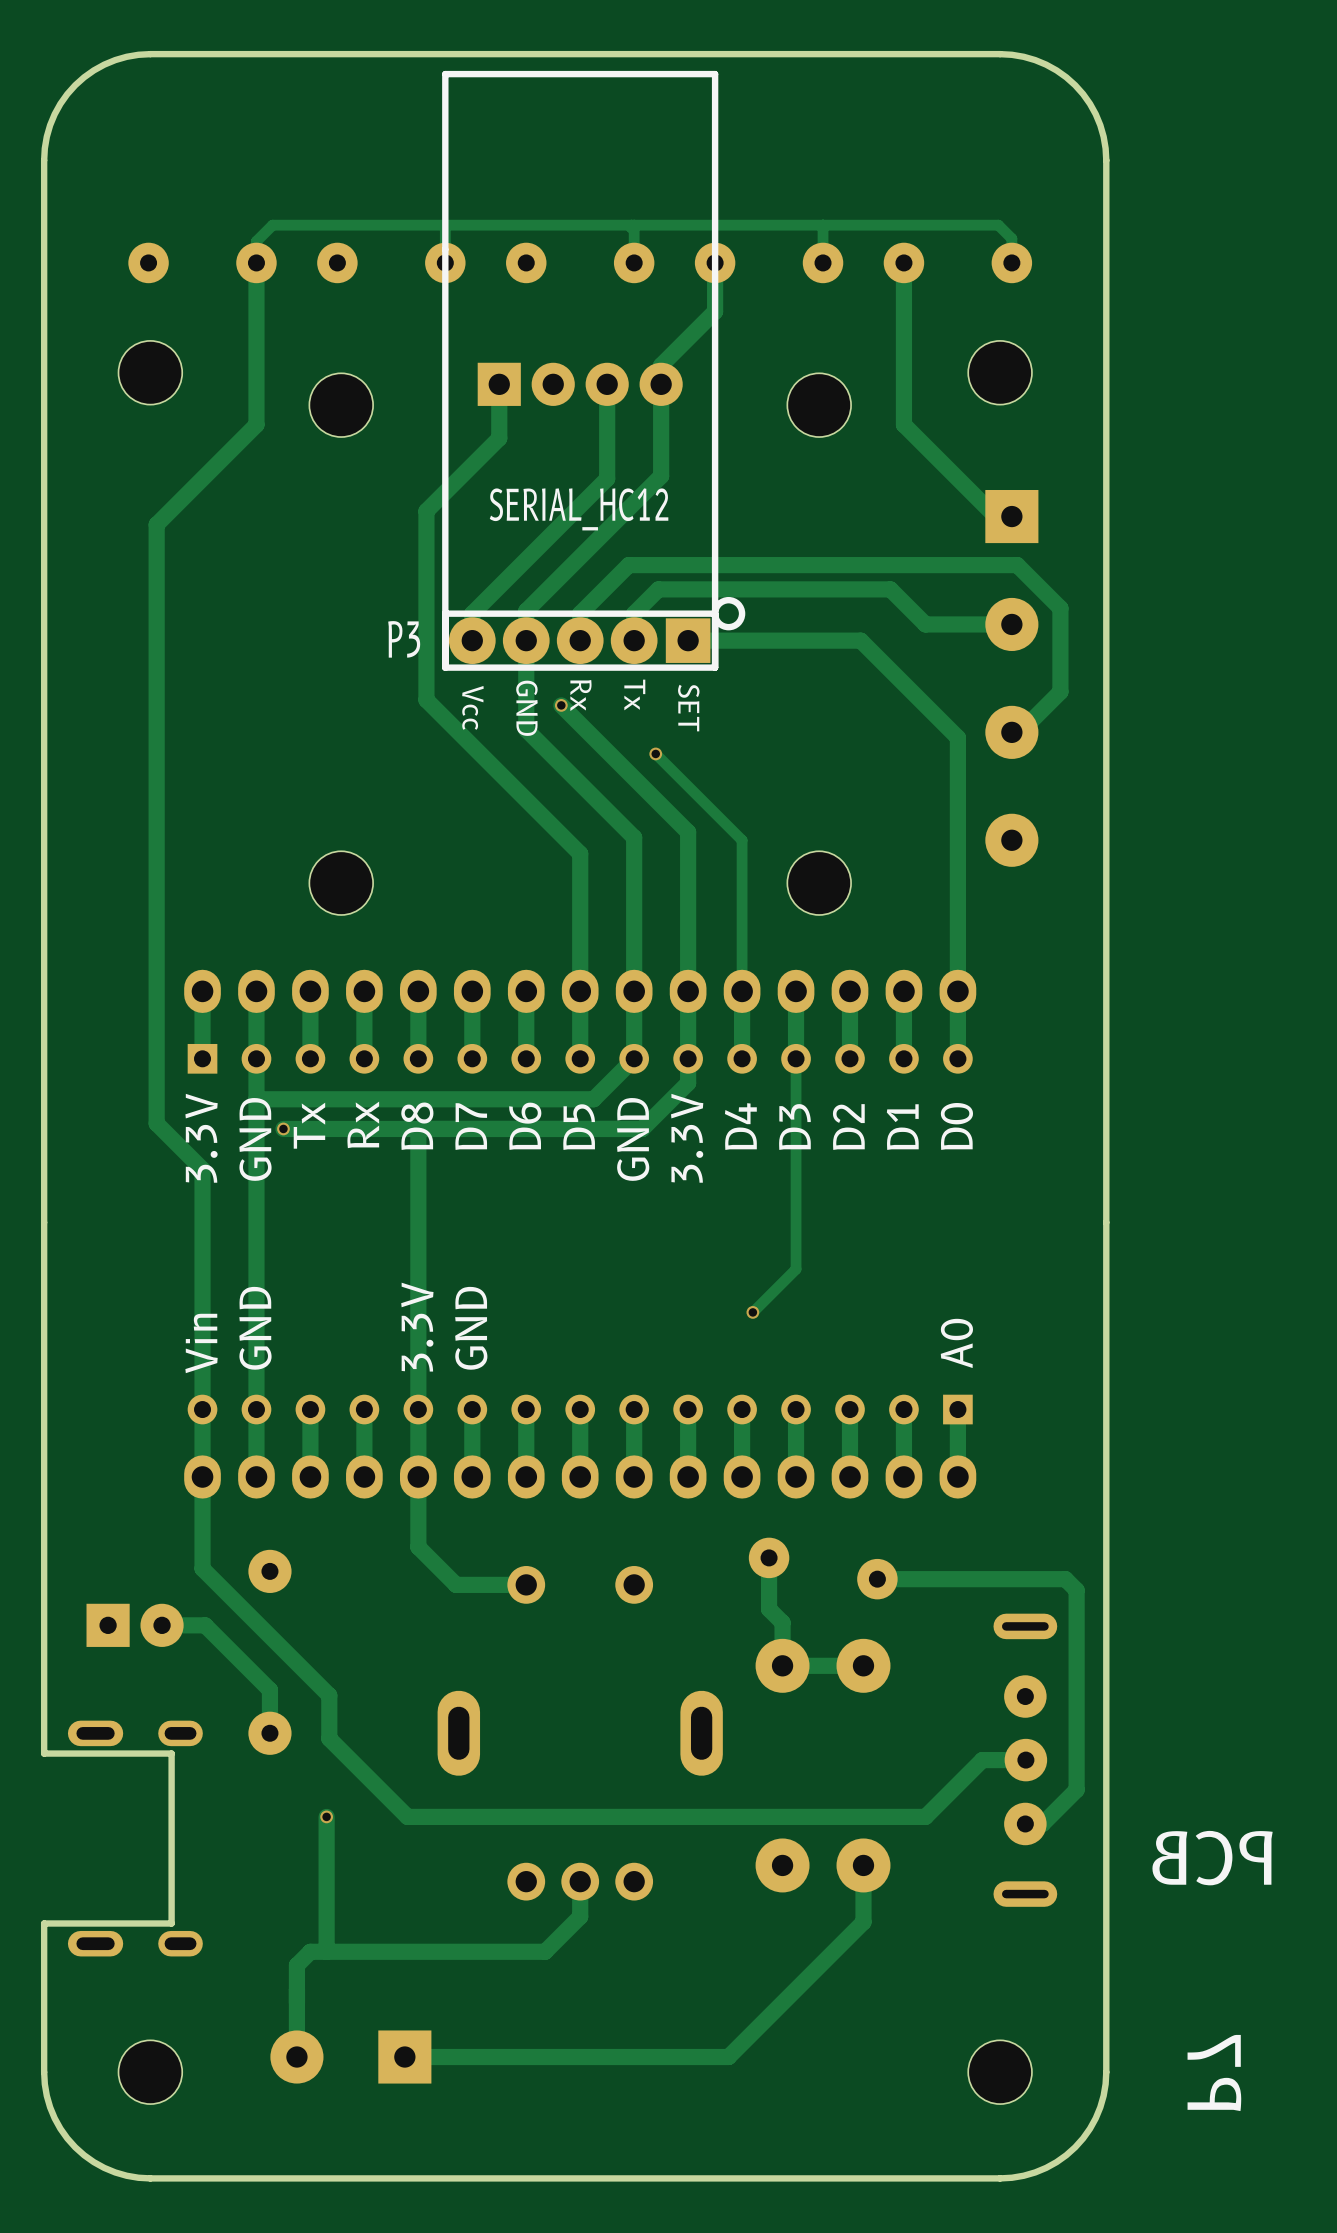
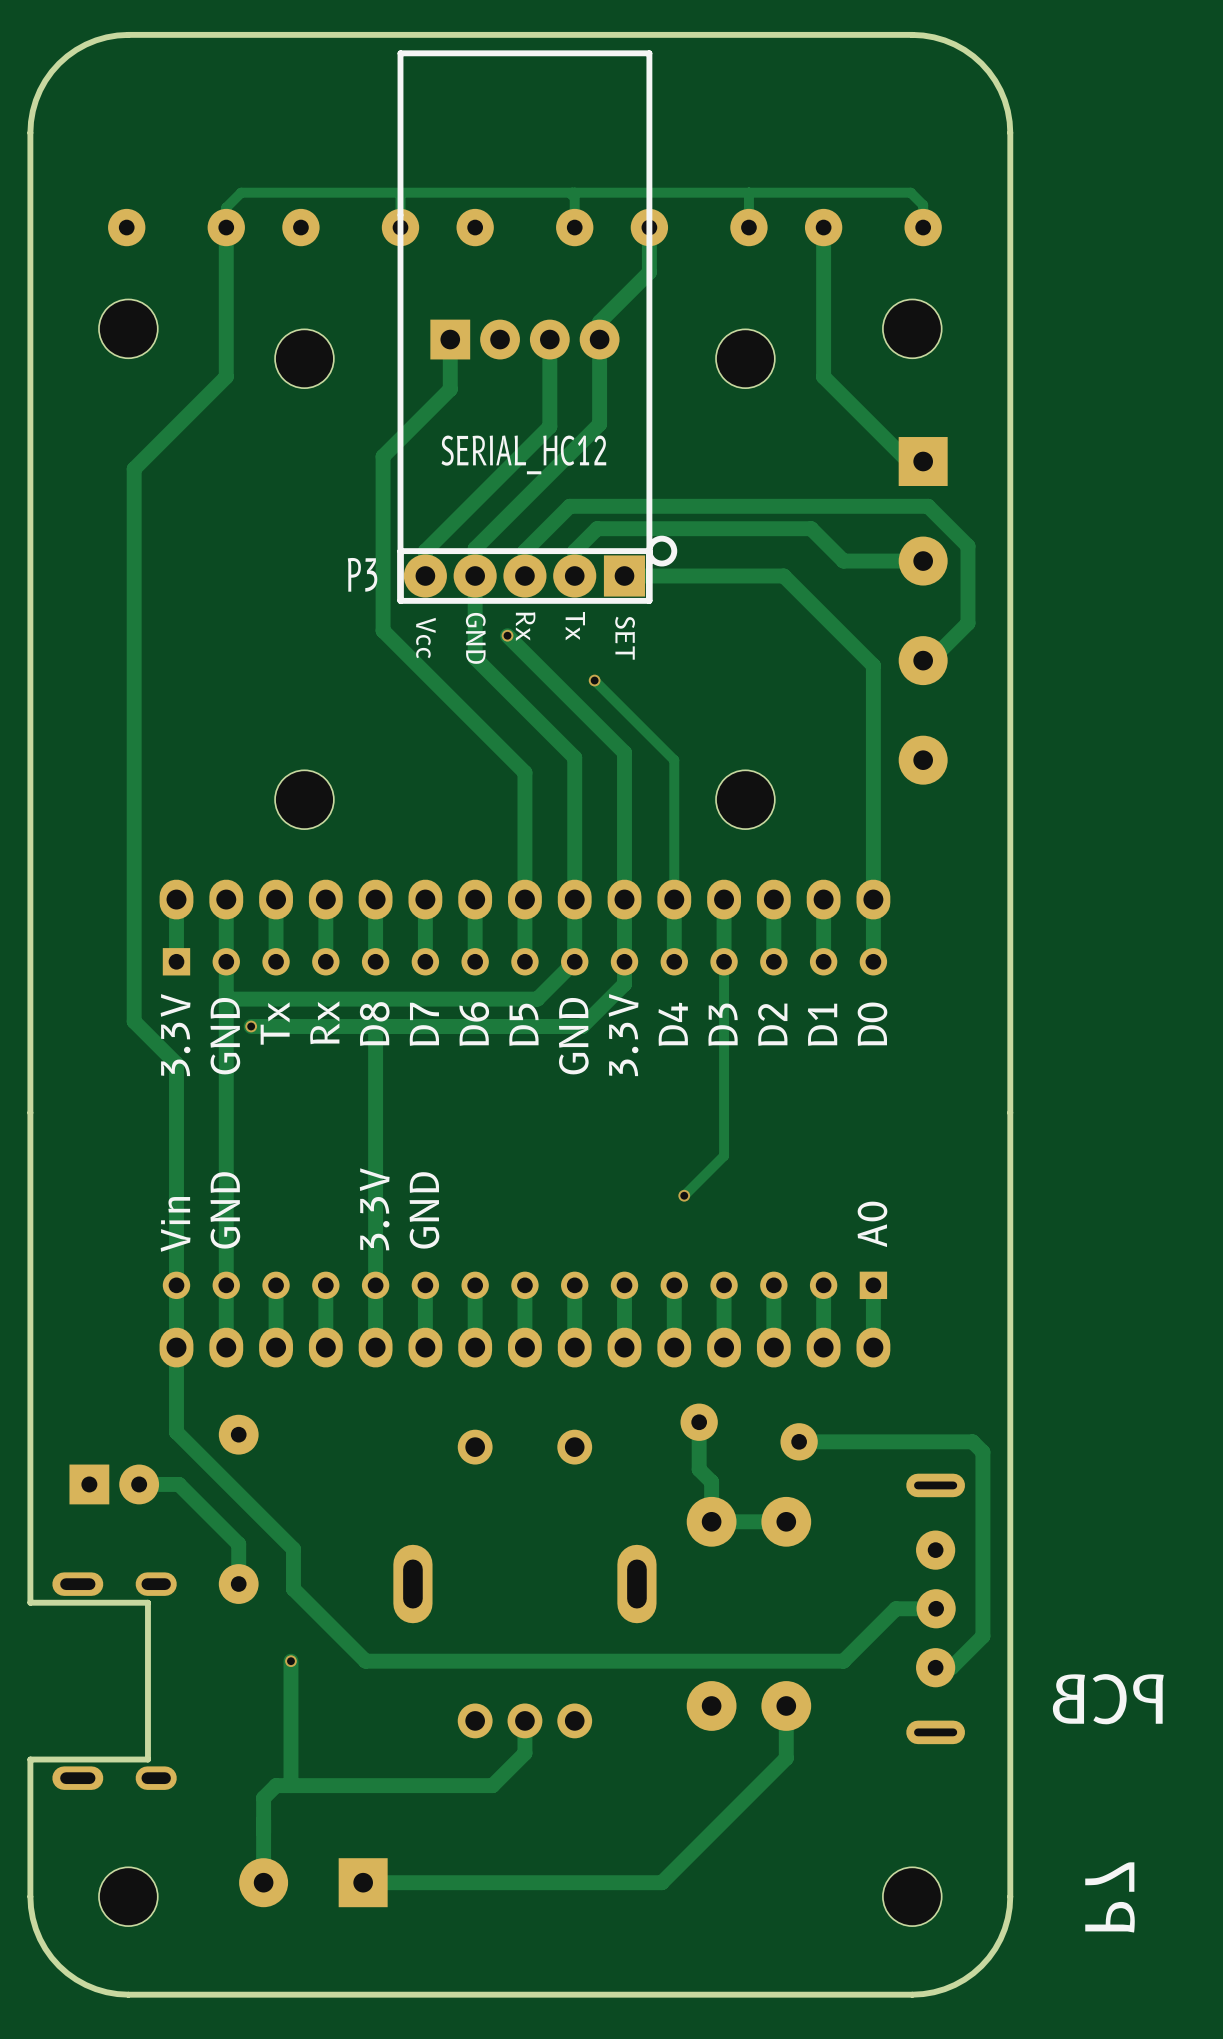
track: (418, 1476) (418, 1547) (456, 1584) (526, 1584) -> none

